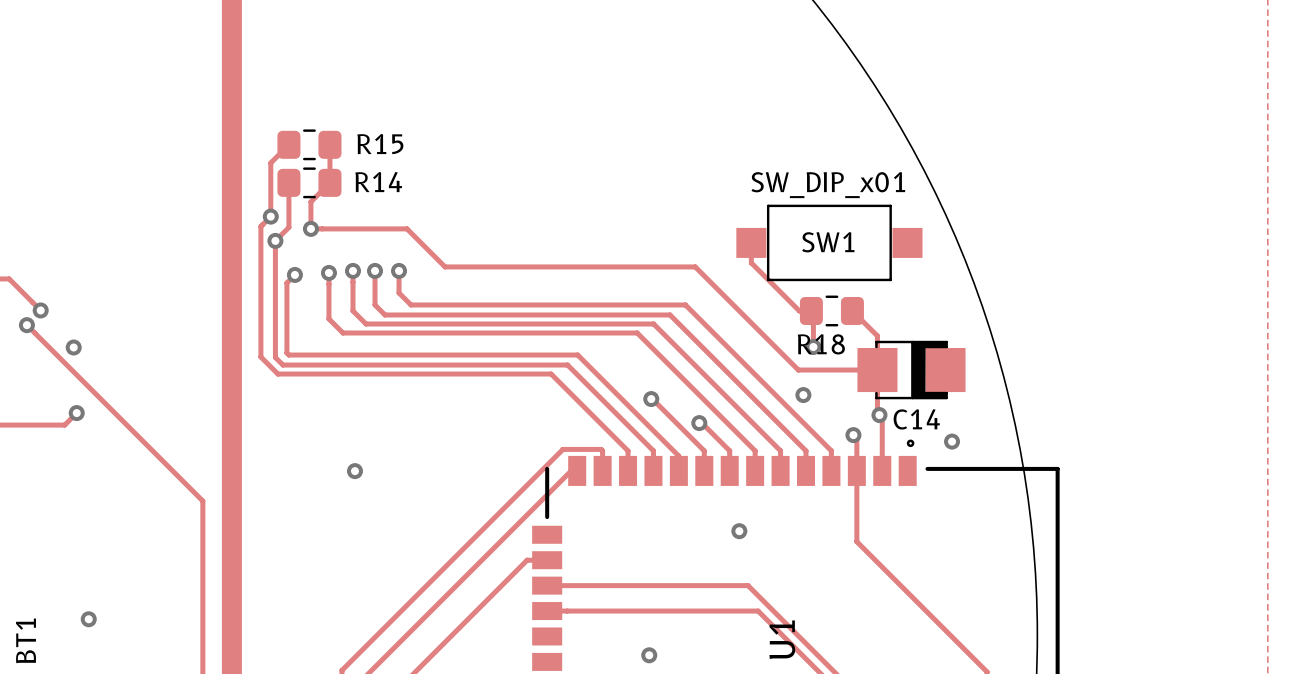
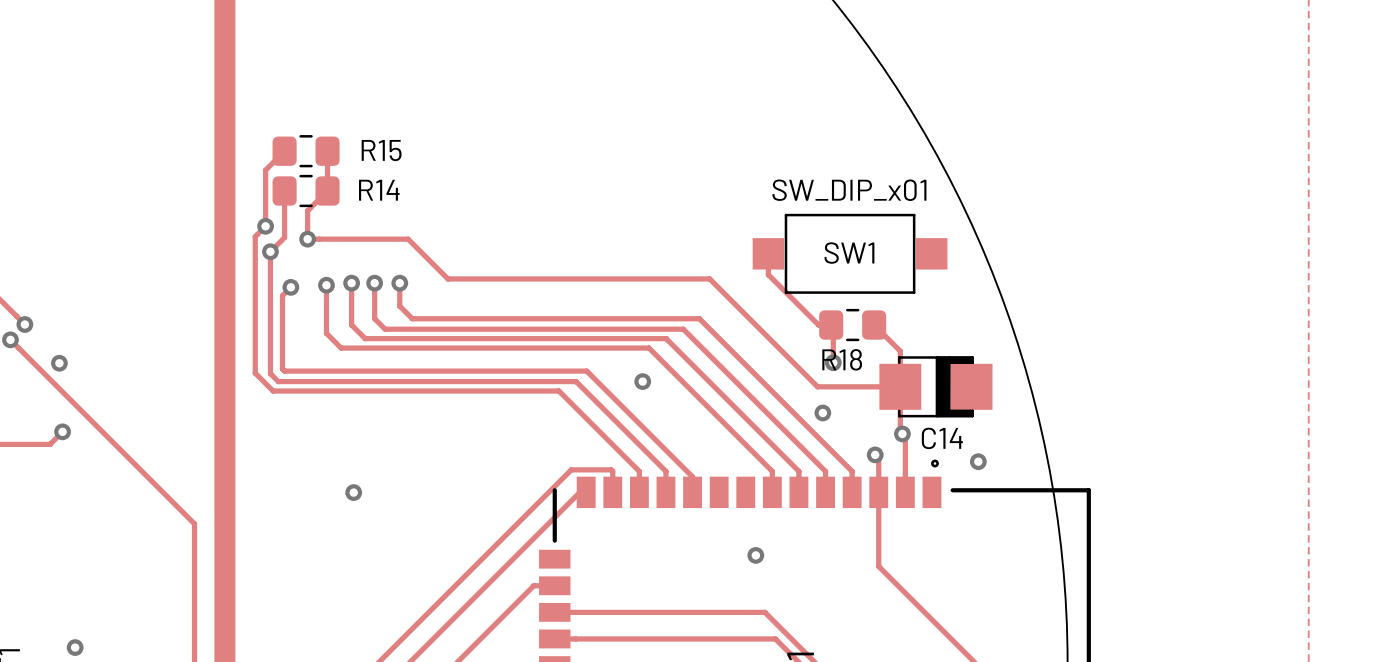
track: (651, 399) (704, 450) (704, 470) -> none
via position: (651, 399) -> (642, 381)
track: (699, 423) (701, 423) (729, 450) (729, 470) -> none
via: (699, 423) -> none

